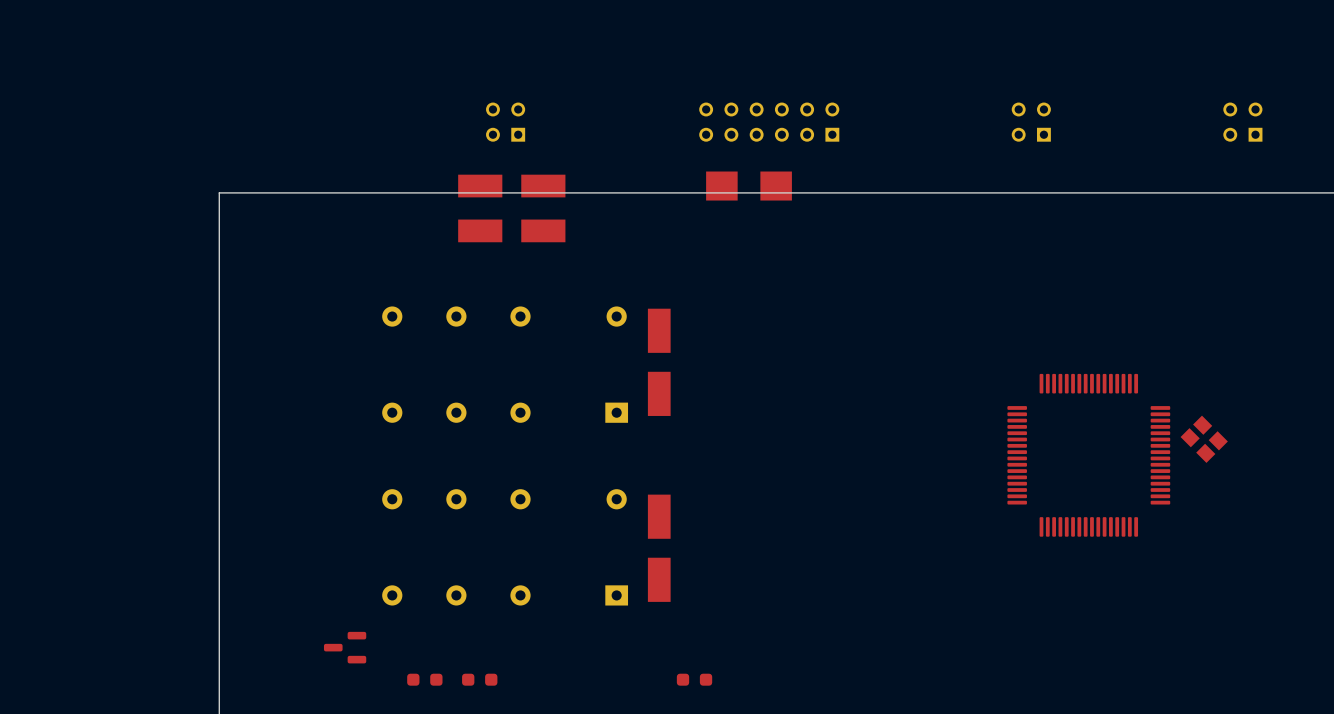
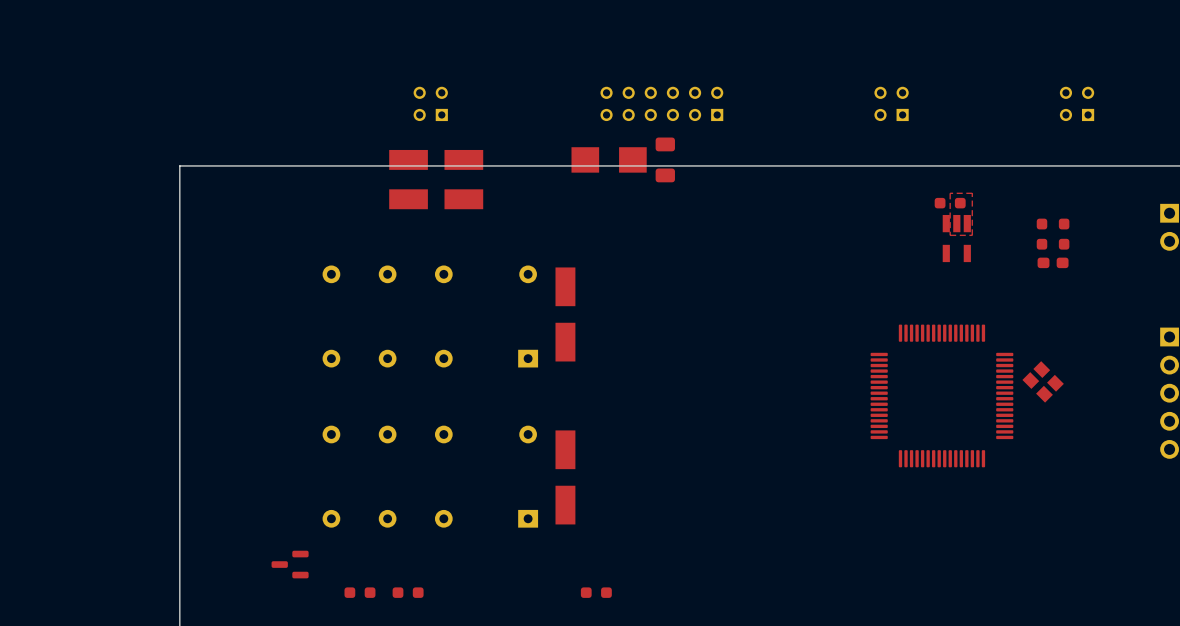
part position: (749, 186) -> (609, 159)
part: none -> (665, 159)
top zone outline: none -> (972, 193) (972, 235) (950, 235) (950, 193) (972, 193)
part: none -> (950, 203)
part: none -> (1041, 234)
part: none -> (1064, 234)
part: none -> (956, 238)
part: none -> (1053, 262)

